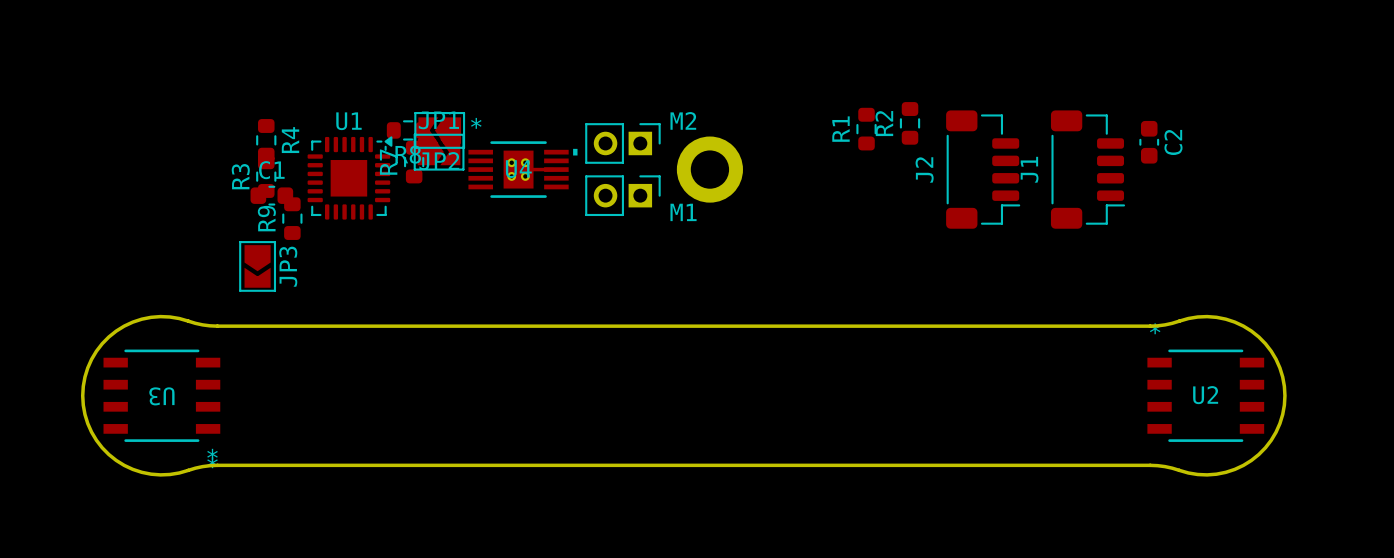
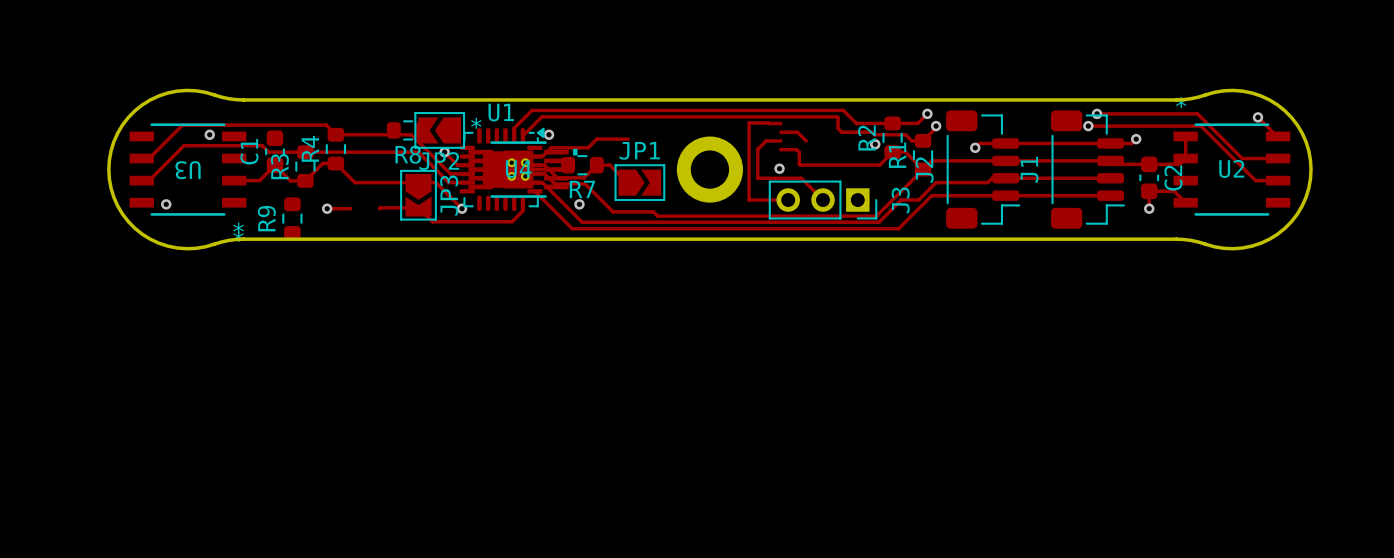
track: none -> (927, 113) (917, 123) (856, 123)
via: none -> (927, 113)
track: none -> (1097, 113) (1197, 113) (1242, 158) (1278, 158)
via: none -> (1097, 113)
track: none -> (1257, 117) (1278, 136)
via: none -> (1257, 117)
track: none -> (780, 123) (749, 122) (749, 200) (788, 200)
track: none -> (856, 123) (843, 110) (532, 110) (514, 128) (514, 135)
R2 position: (910, 123) -> (892, 137)
track: none -> (936, 126) (923, 140) (911, 140) (905, 134) (841, 132) (838, 128) (837, 116) (541, 116) (522, 135)
via: none -> (936, 126)
track: none -> (1088, 126) (1201, 126) (1255, 180) (1278, 180)
via: none -> (1088, 126)
R1 position: (866, 129) -> (923, 155)
track: none -> (780, 132) (797, 132) (806, 140)
via: none -> (209, 134)
via: none -> (549, 134)
track: none -> (1185, 136) (1185, 158) (1179, 164) (1109, 164) (1105, 160) (931, 160) (876, 216) (657, 216) (653, 211) (613, 211) (585, 183) (554, 183) (544, 173) (534, 173)
track: none -> (628, 139) (596, 139) (588, 147) (551, 147) (542, 156) (534, 156)
track: none -> (1136, 139) (1131, 143) (979, 143) (975, 147)
via: none -> (1136, 139)
R4 position: (266, 140) -> (335, 149)
R4 name position: R4 (290, 140) -> R4 (310, 148)
track: none -> (780, 140) (766, 140) (757, 149) (757, 178) (801, 178) (823, 200)
C2 position: (1149, 142) -> (1149, 177)
M2: (622, 143) -> none
via: none -> (875, 144)
via: none -> (975, 147)
track: none -> (780, 149) (796, 149) (799, 152) (800, 165) (879, 165) (892, 152) (905, 152) (923, 169)
JP1 position: (439, 152) -> (639, 182)
track: none -> (444, 152) (457, 165) (467, 165)
via: none -> (444, 152)
track: none -> (141, 158) (149, 158) (182, 125) (326, 125) (335, 134) (411, 134) (450, 173) (467, 173)
R7 name position: R7 (388, 162) -> R7 (582, 189)
R7 rotation: 0° (414, 162) -> 90° clockwise (582, 165)
R7 position: (414, 162) -> (582, 165)
track: none -> (534, 165) (544, 165) (557, 177) (584, 177) (596, 165) (609, 165) (627, 182)
via: none -> (779, 168)
C1 name position: C1 (271, 170) -> C1 (249, 151)
R3 position: (266, 176) -> (305, 166)
U1 position: (350, 177) -> (502, 169)
track: none -> (1105, 178) (992, 178) (987, 182) (936, 182) (918, 199) (901, 199) (879, 222) (582, 222) (542, 182) (534, 182)
track: none -> (141, 180) (149, 180) (184, 145) (262, 145) (268, 152) (418, 152) (448, 182) (467, 182)
track: none -> (234, 180) (259, 180) (274, 165) (290, 180) (305, 180) (322, 163) (335, 163) (355, 182) (435, 182) (462, 208)
track: none -> (534, 191) (572, 228) (898, 228) (931, 195) (1105, 195)
C1 rotation: 0° (271, 195) -> 90° clockwise (274, 151)
C1 position: (271, 195) -> (274, 151)
M1: (622, 195) -> none
J3: none -> (823, 200)
track: none -> (1185, 202) (1174, 191) (1149, 191) (1149, 208)
track: none -> (522, 203) (522, 210) (512, 221) (432, 221) (418, 207) (379, 208)
via: none -> (166, 204)
via: none -> (579, 204)
track: none -> (327, 208) (350, 208)
via: none -> (327, 208)
via: none -> (462, 208)
via: none -> (1149, 208)
JP3 position: (257, 266) -> (418, 195)
board edge: (188, 321) (160, 316) (132, 322) (116, 331) (102, 343) (87, 367) (83, 386) (83, 405) (91, 432) (108, 454) (132, 469) (160, 474) (217, 465) (1150, 465) (1207, 474) (1234, 469) (1258, 454) (1276, 432) (1284, 405) (1284, 386) (1279, 367) (1265, 343) (1251, 331) (1234, 322) (1207, 316) (1150, 326) (217, 326) (188, 321) -> (214, 94) (196, 90) (177, 91) (150, 99) (128, 117) (113, 141) (108, 169) (113, 197) (128, 221) (142, 234) (158, 243) (186, 248) (243, 239) (1176, 239) (1233, 248) (1260, 243) (1284, 228) (1302, 205) (1310, 179) (1310, 160) (1306, 141) (1291, 117) (1269, 99) (1251, 93) (1233, 90) (1176, 99) (243, 99) (214, 94)
U3 position: (161, 395) -> (187, 169)
U2 position: (1205, 395) -> (1231, 169)

